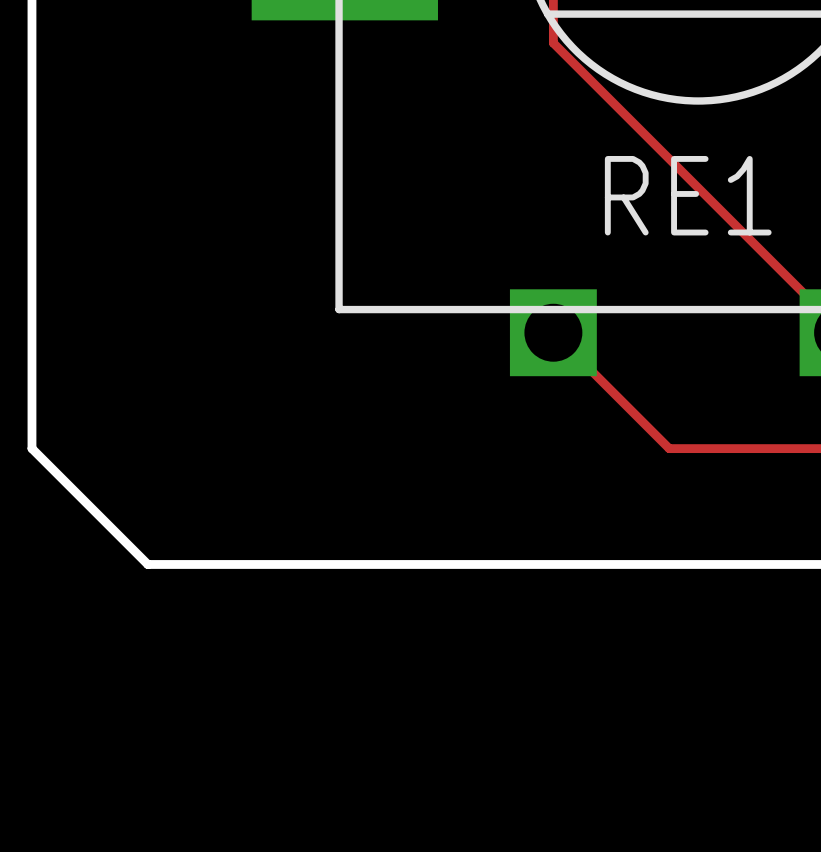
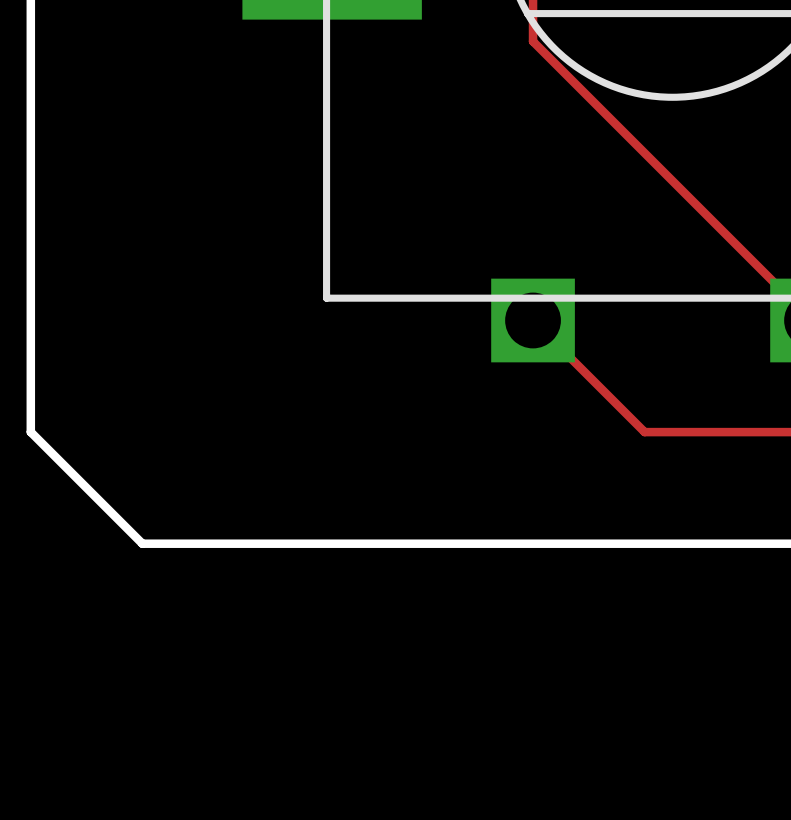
RE1 name: RE1 (688, 195) -> none

